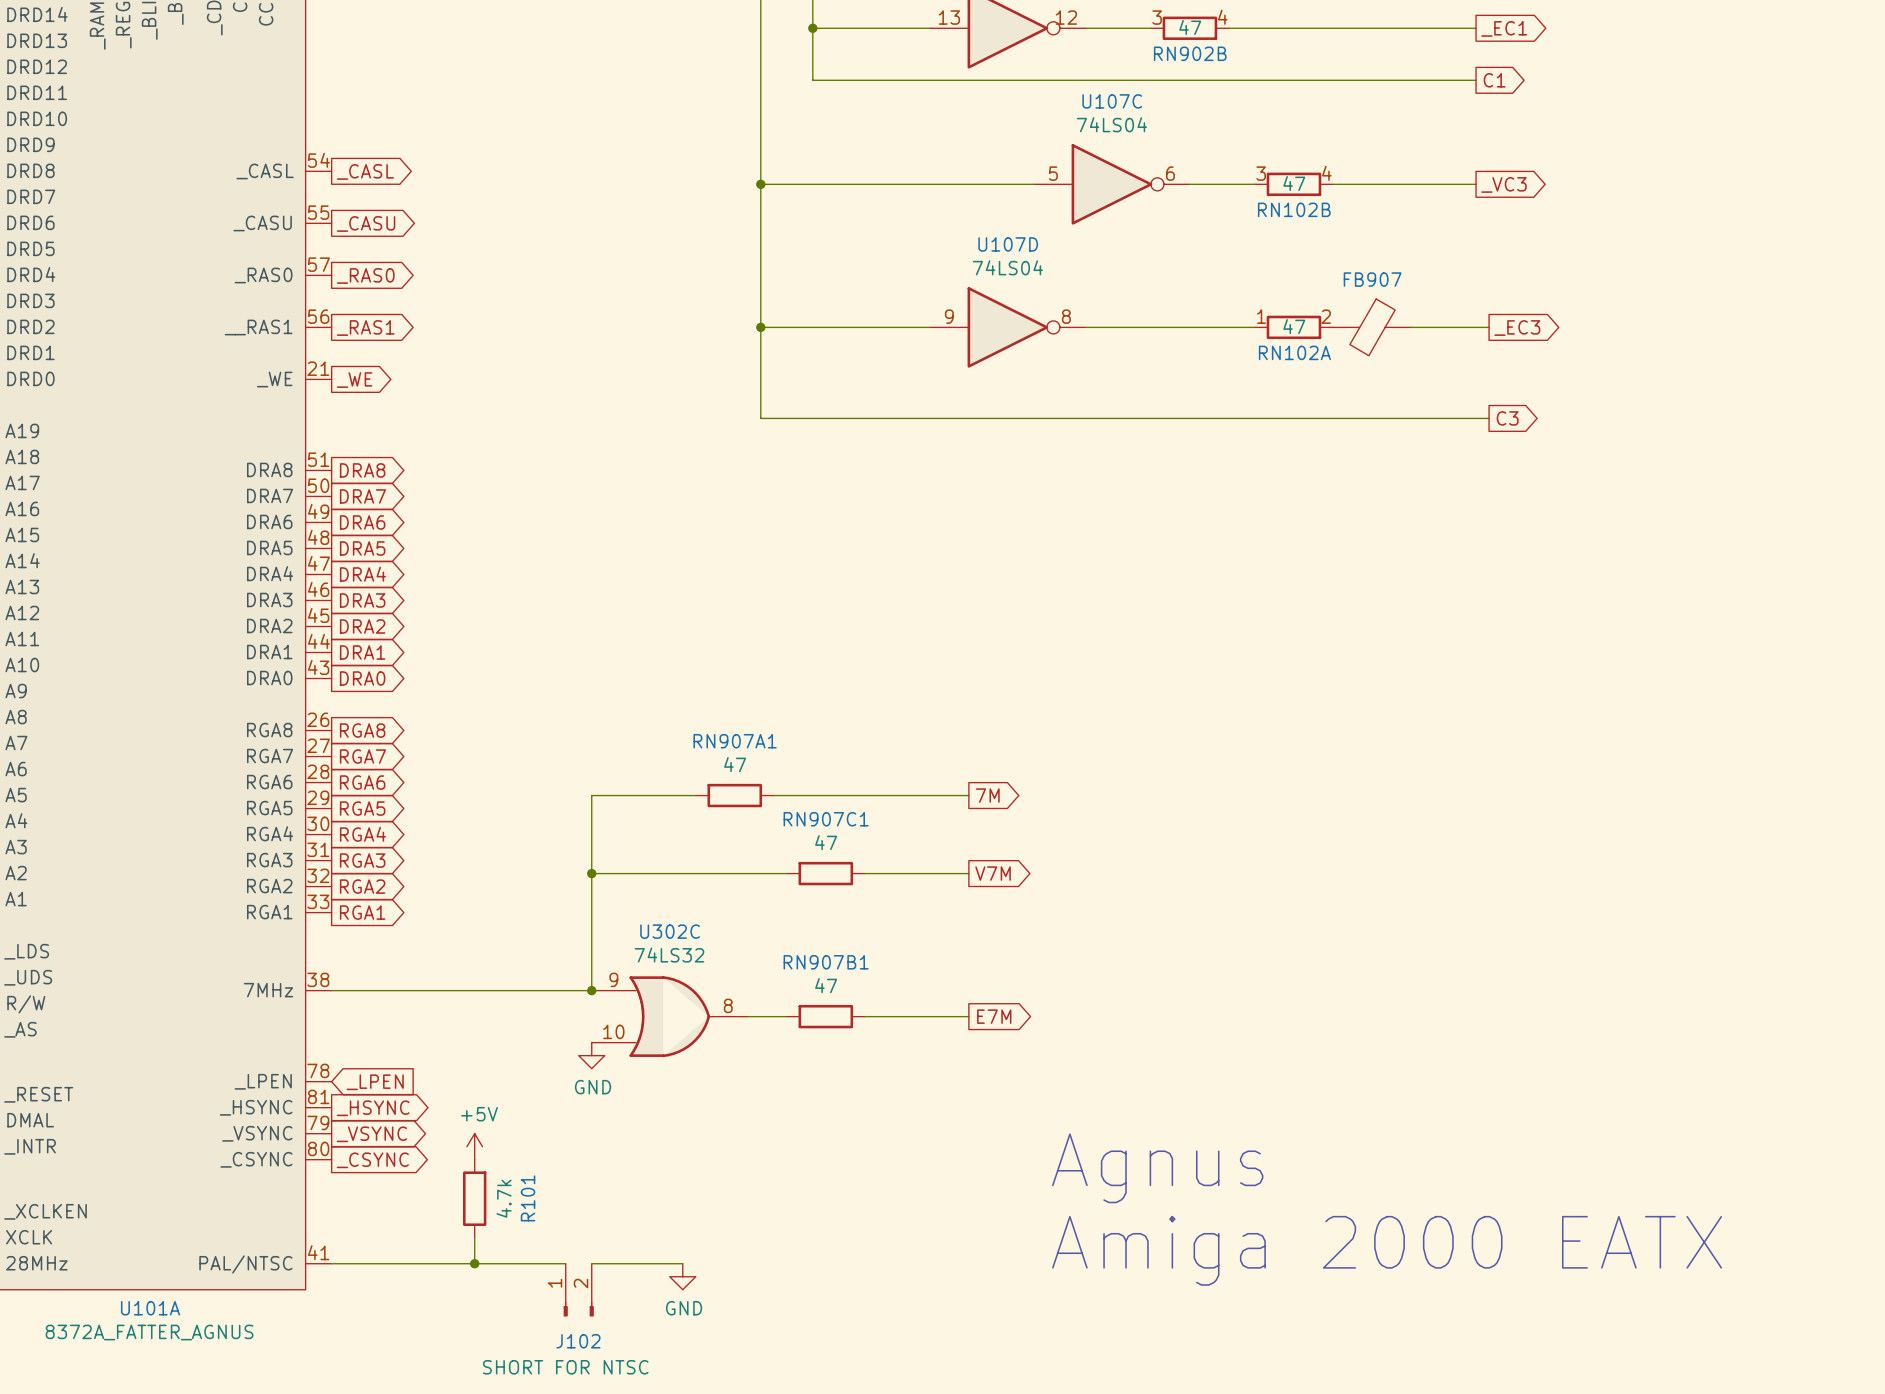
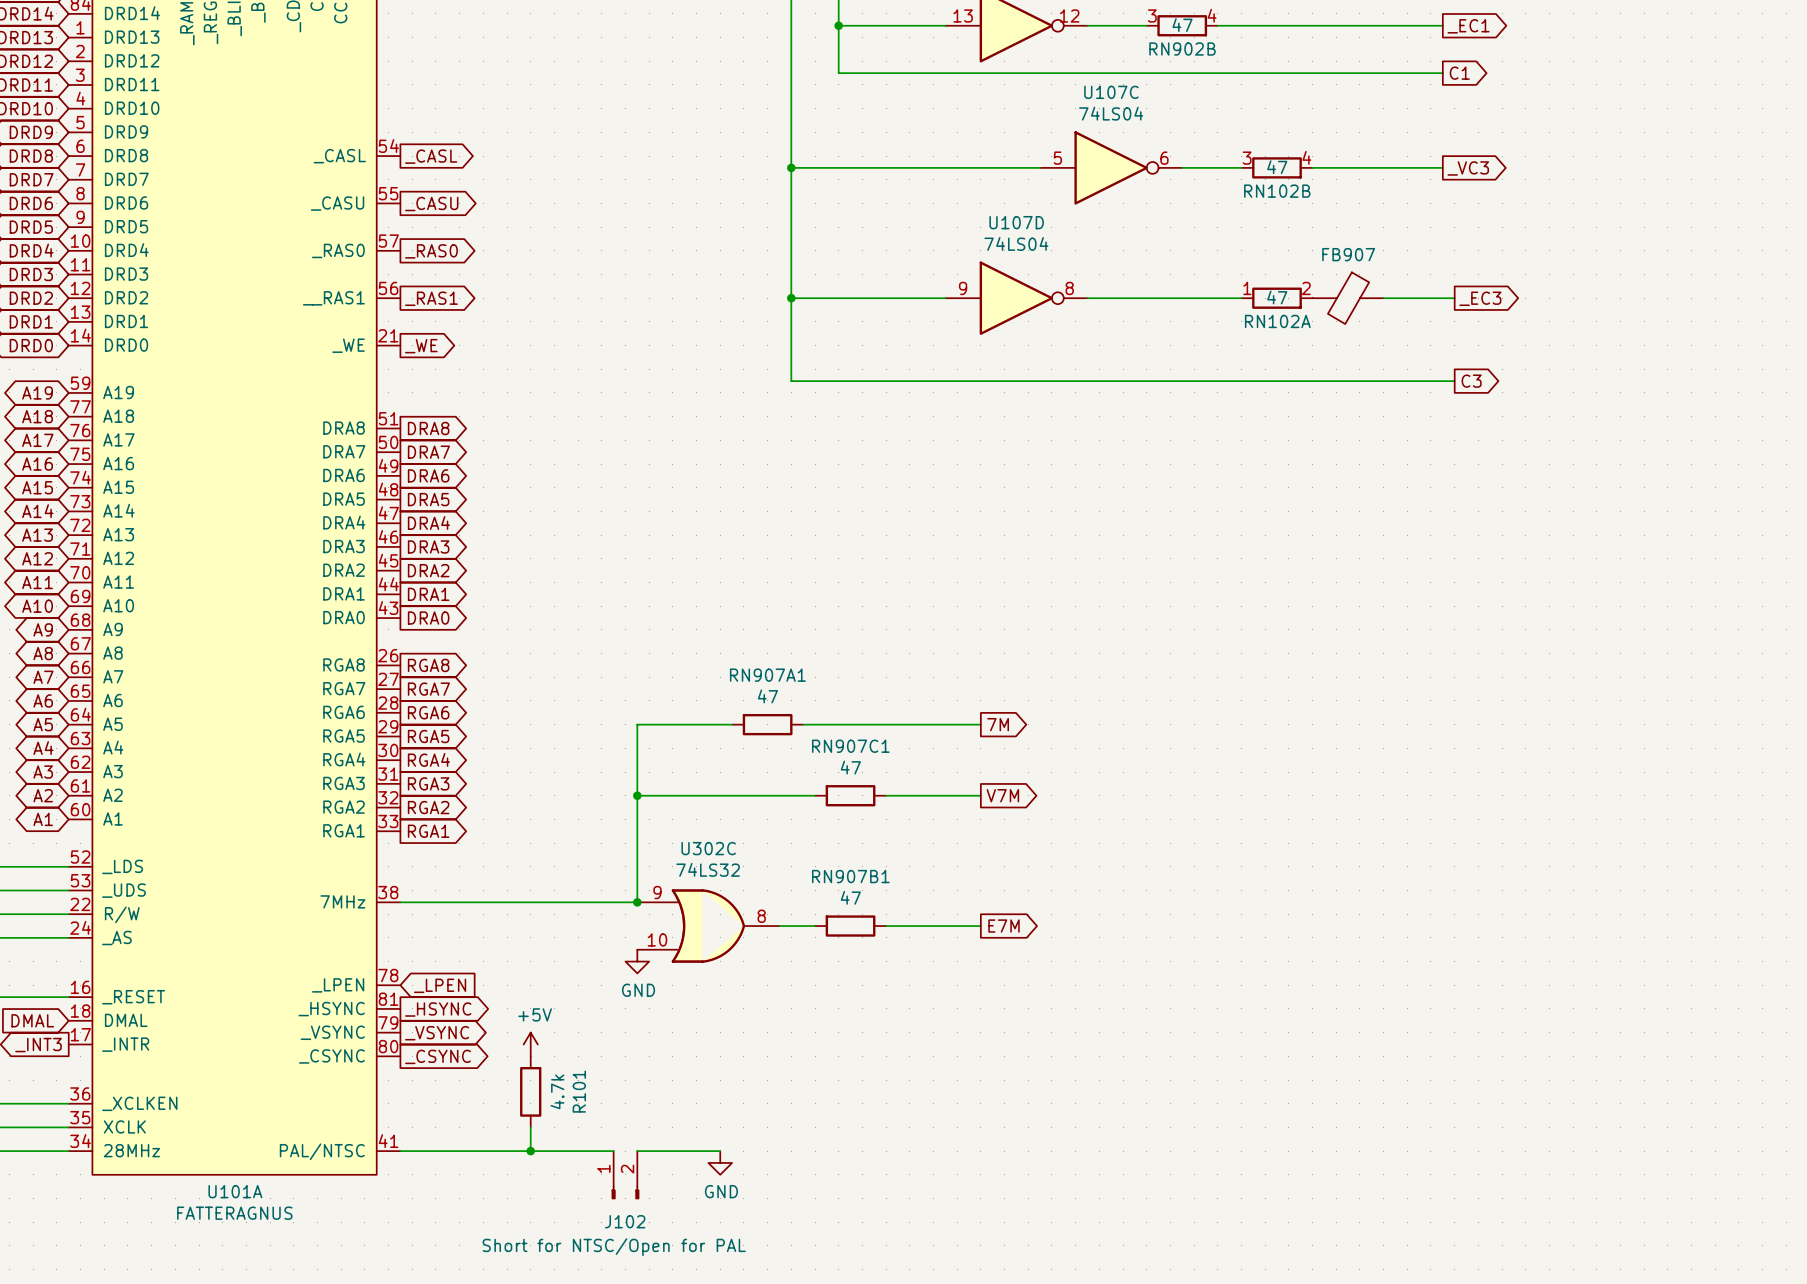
text: Agnus (1157, 1168) -> none
text: Amiga 2000 EATX (1387, 1250) -> none
U101A value: 8372A_FATTER_AGNUS (149, 1332) -> FATTERAGNUS (234, 1213)
J102 value: SHORT FOR NTSC (565, 1367) -> Short for NTSC/Open for PAL (614, 1247)

